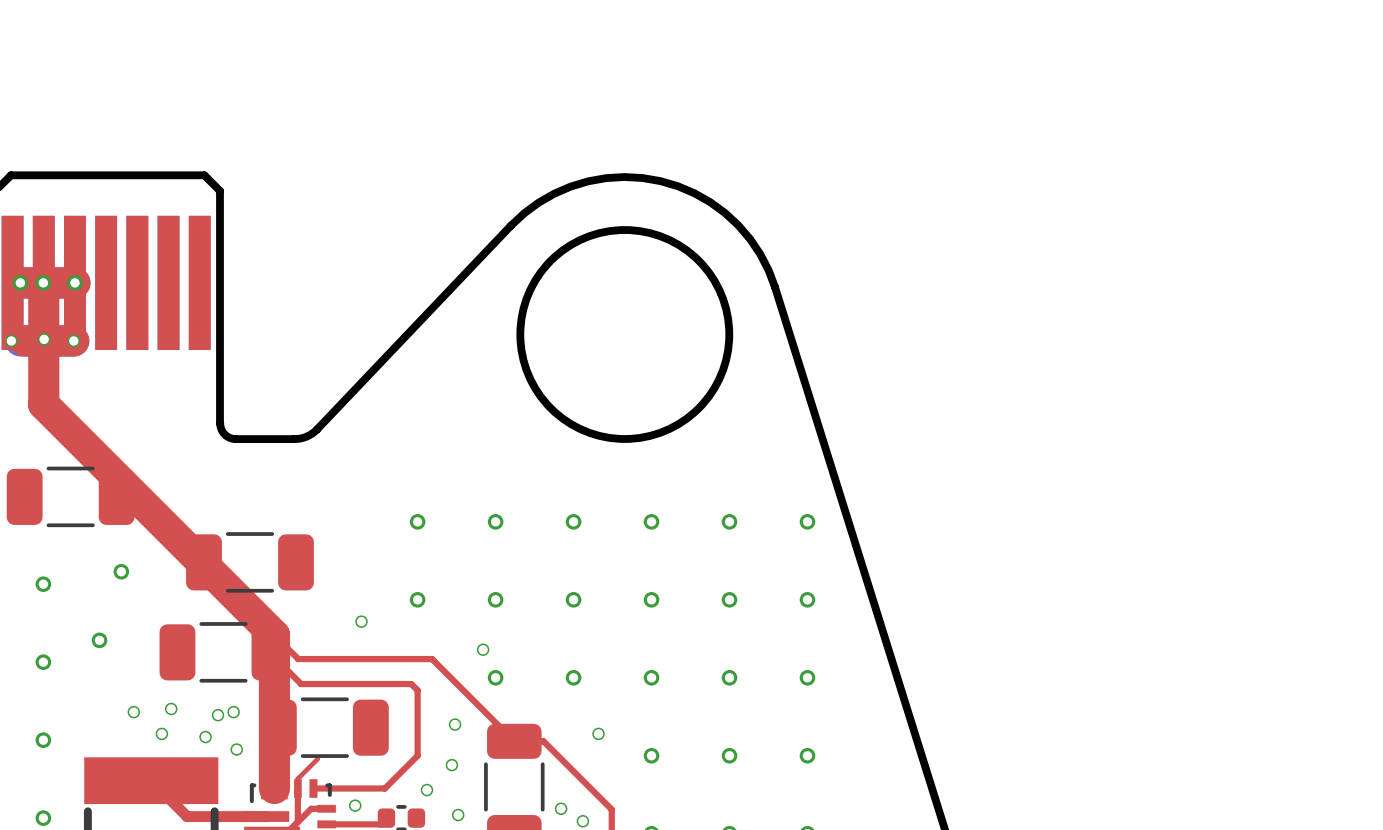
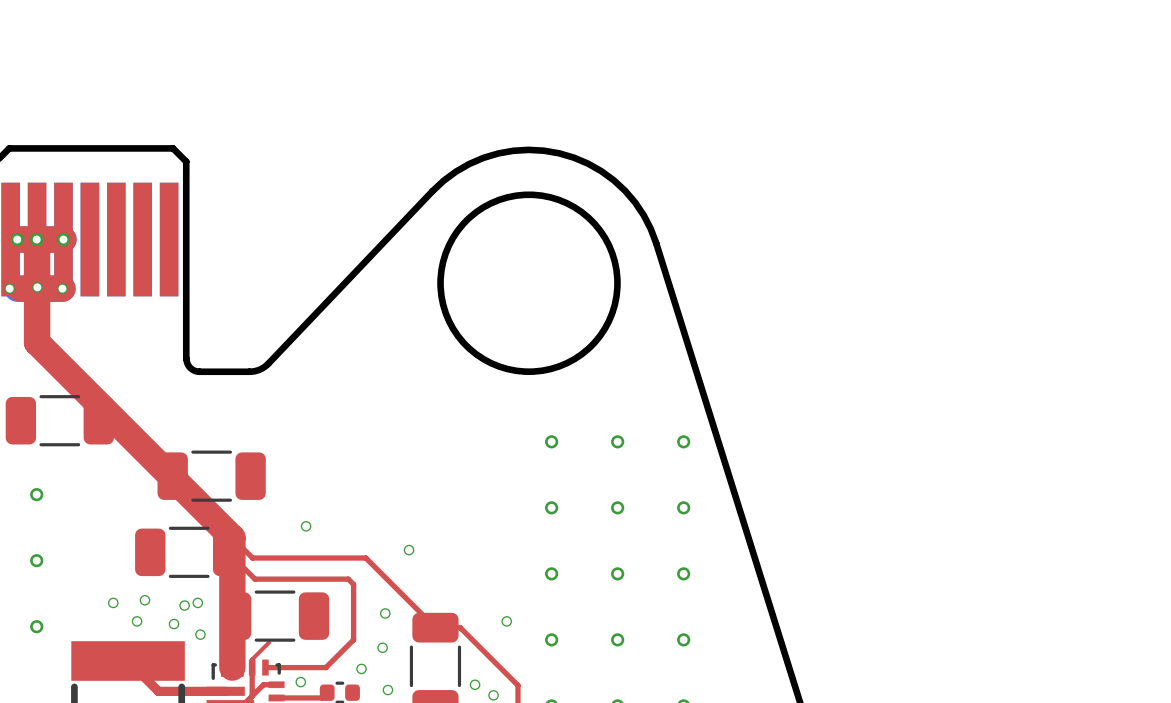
via: (417, 521) -> none
via: (495, 521) -> none
via: (573, 521) -> none
via: (121, 571) -> none
via: (417, 599) -> none
via: (495, 599) -> none
via: (573, 599) -> none
via: (99, 640) -> none
via: (495, 677) -> none
via: (573, 677) -> none
via: (43, 818) -> none

